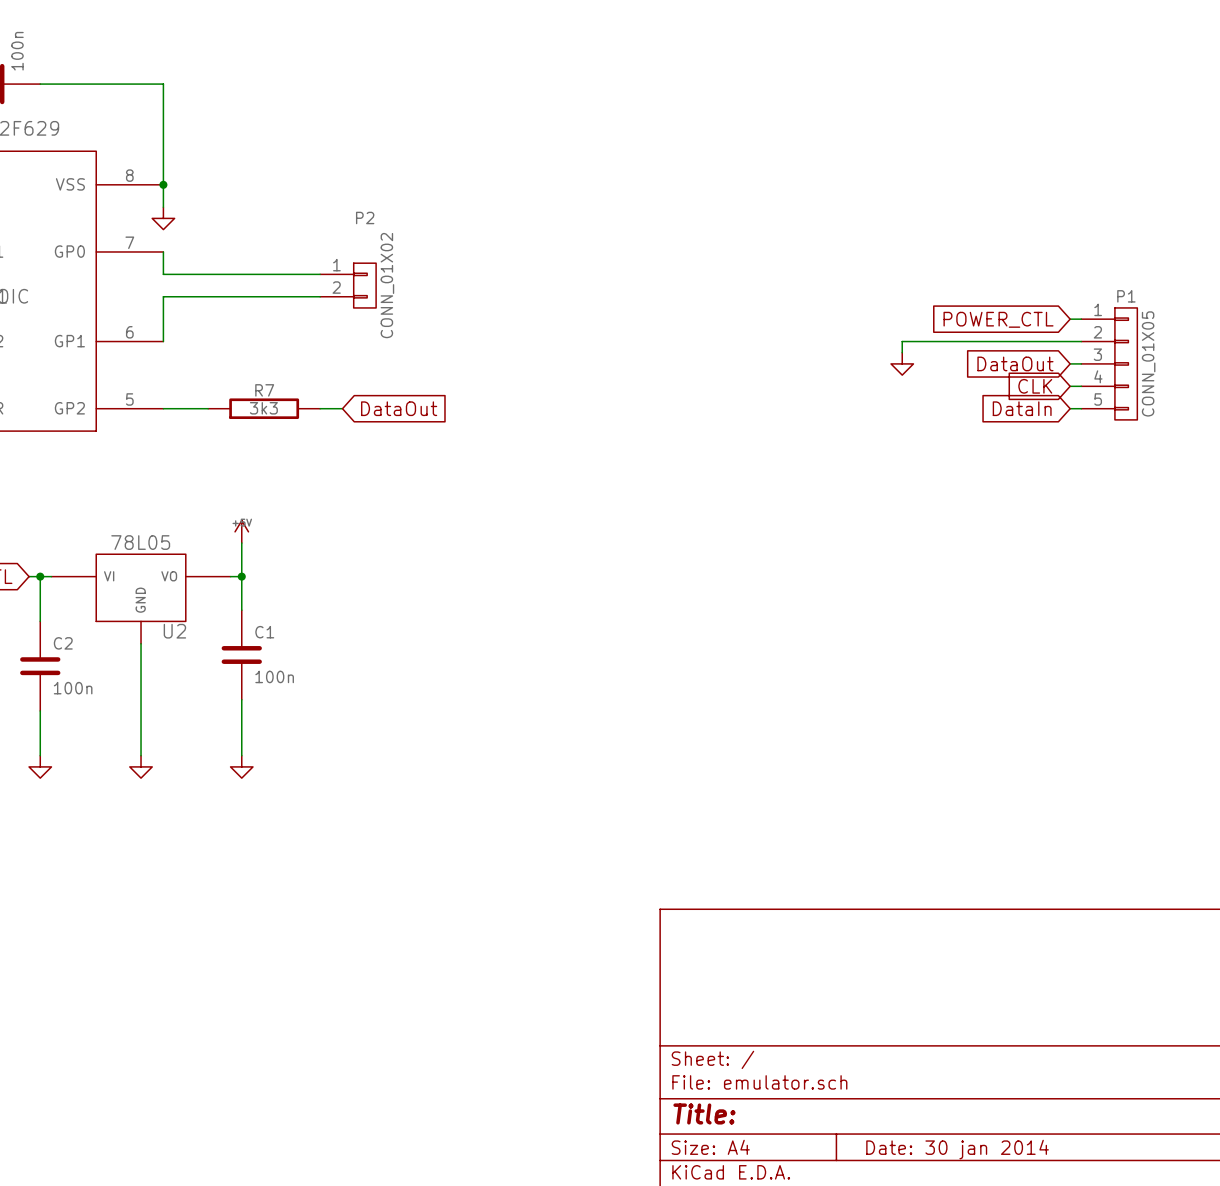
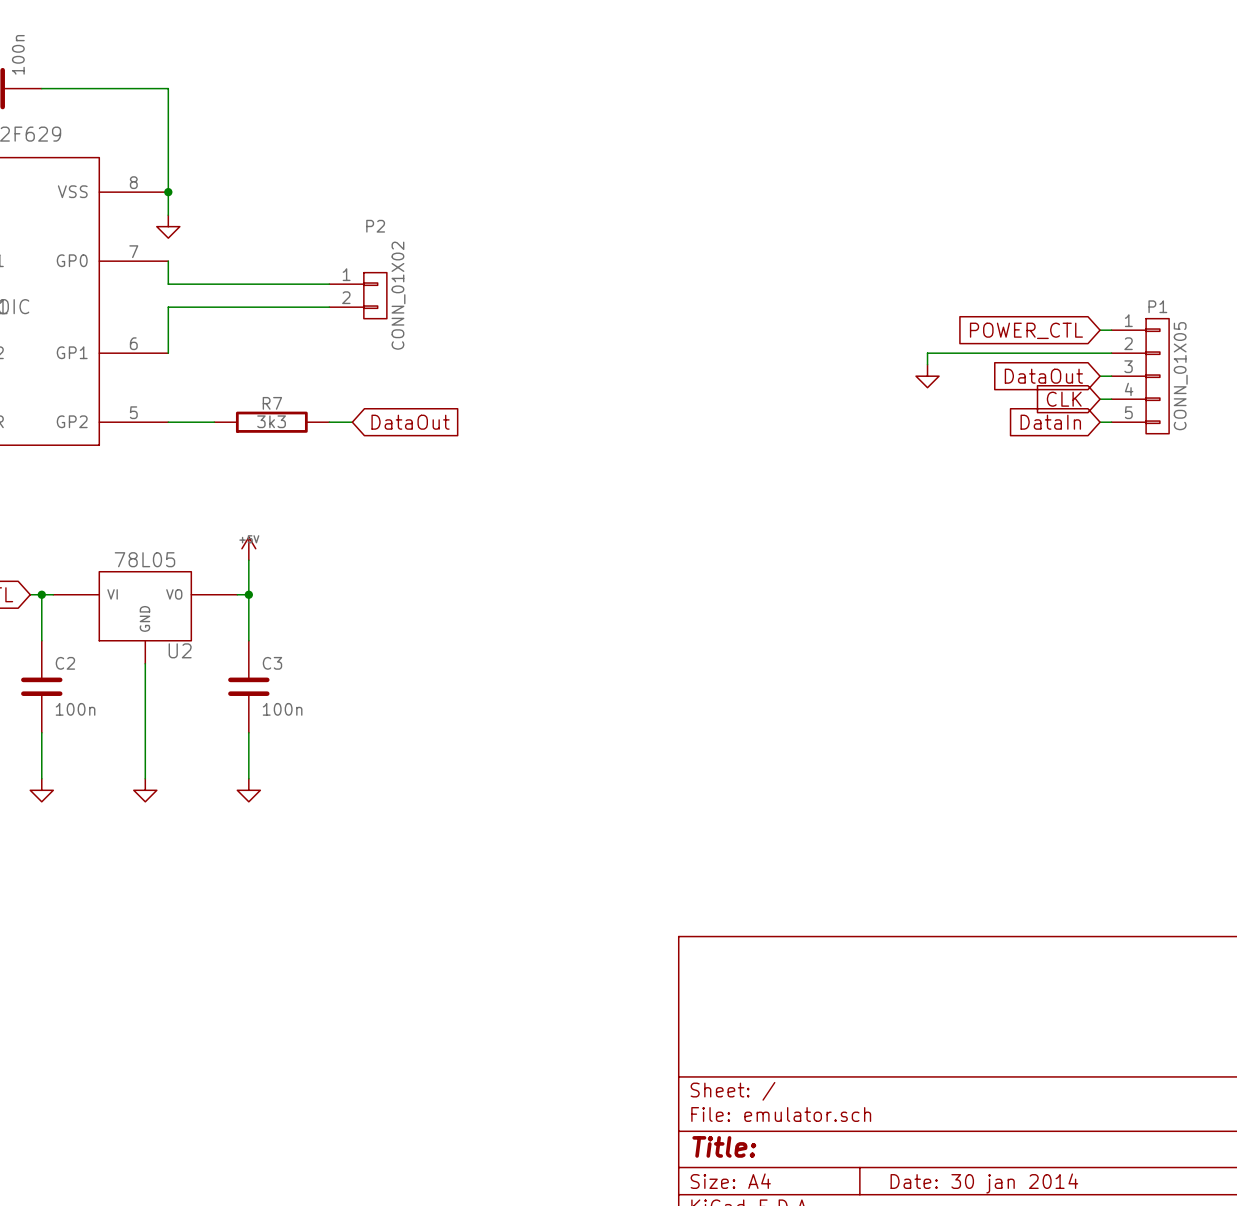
C1: 100n (241, 654) -> none
C3: none -> 100n (248, 686)

